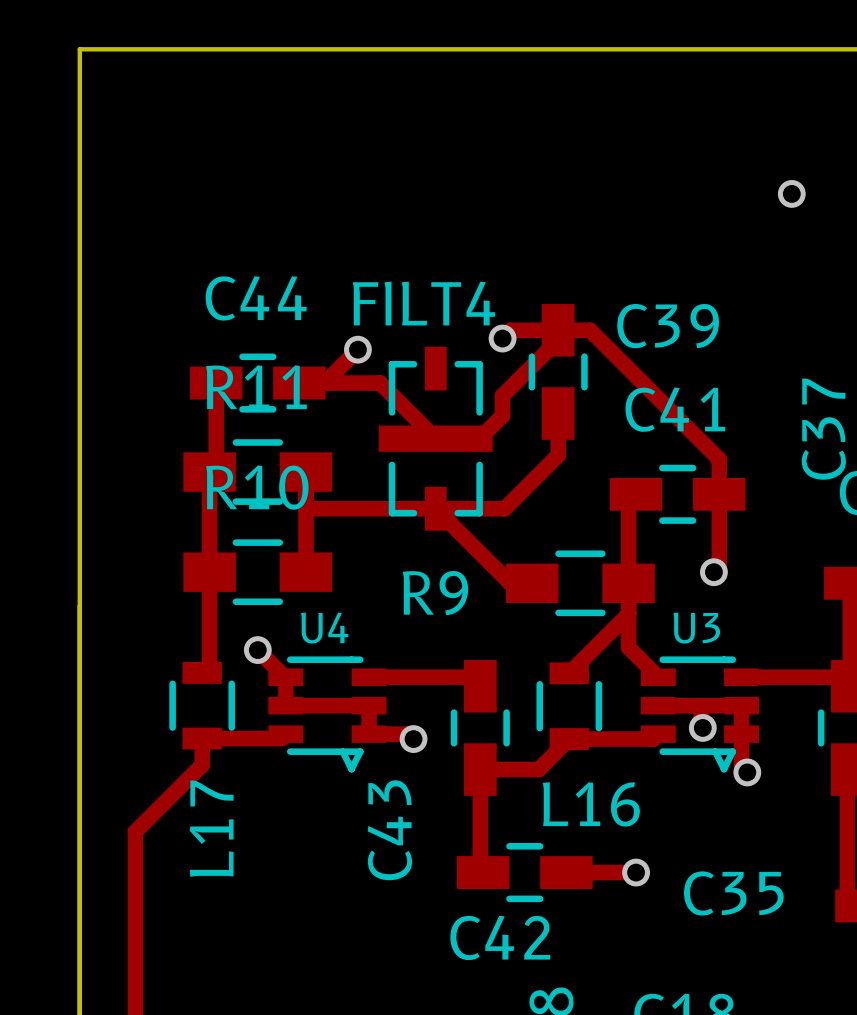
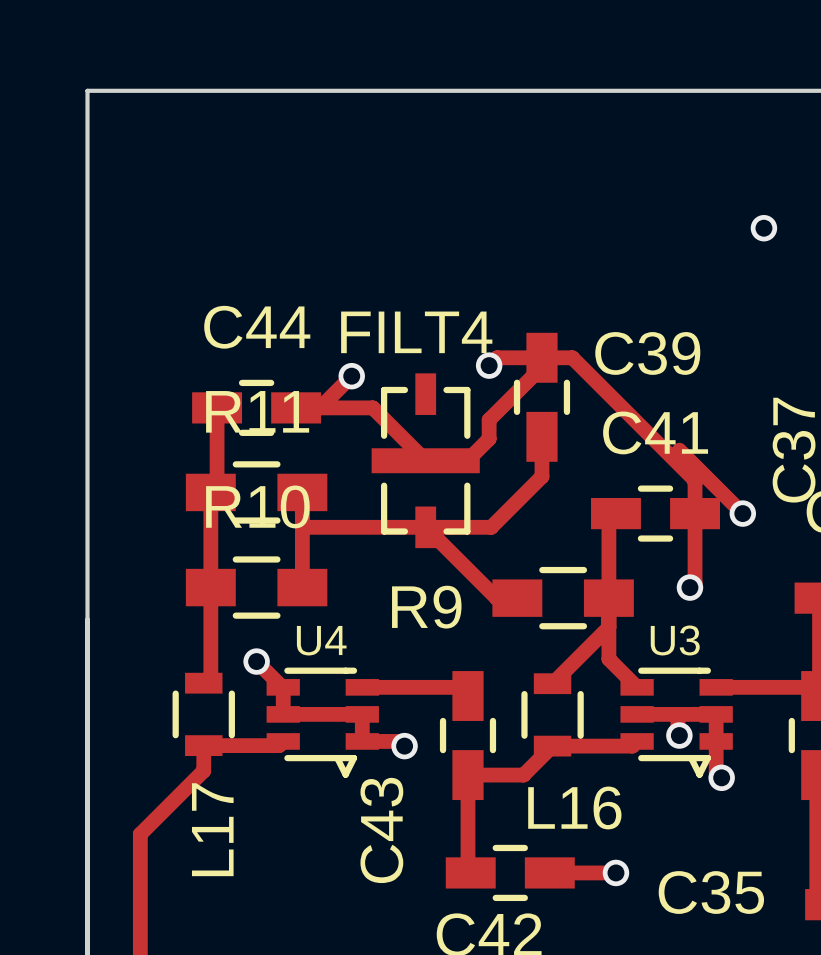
track: none -> (679, 450) (742, 513)
via: none -> (742, 513)

